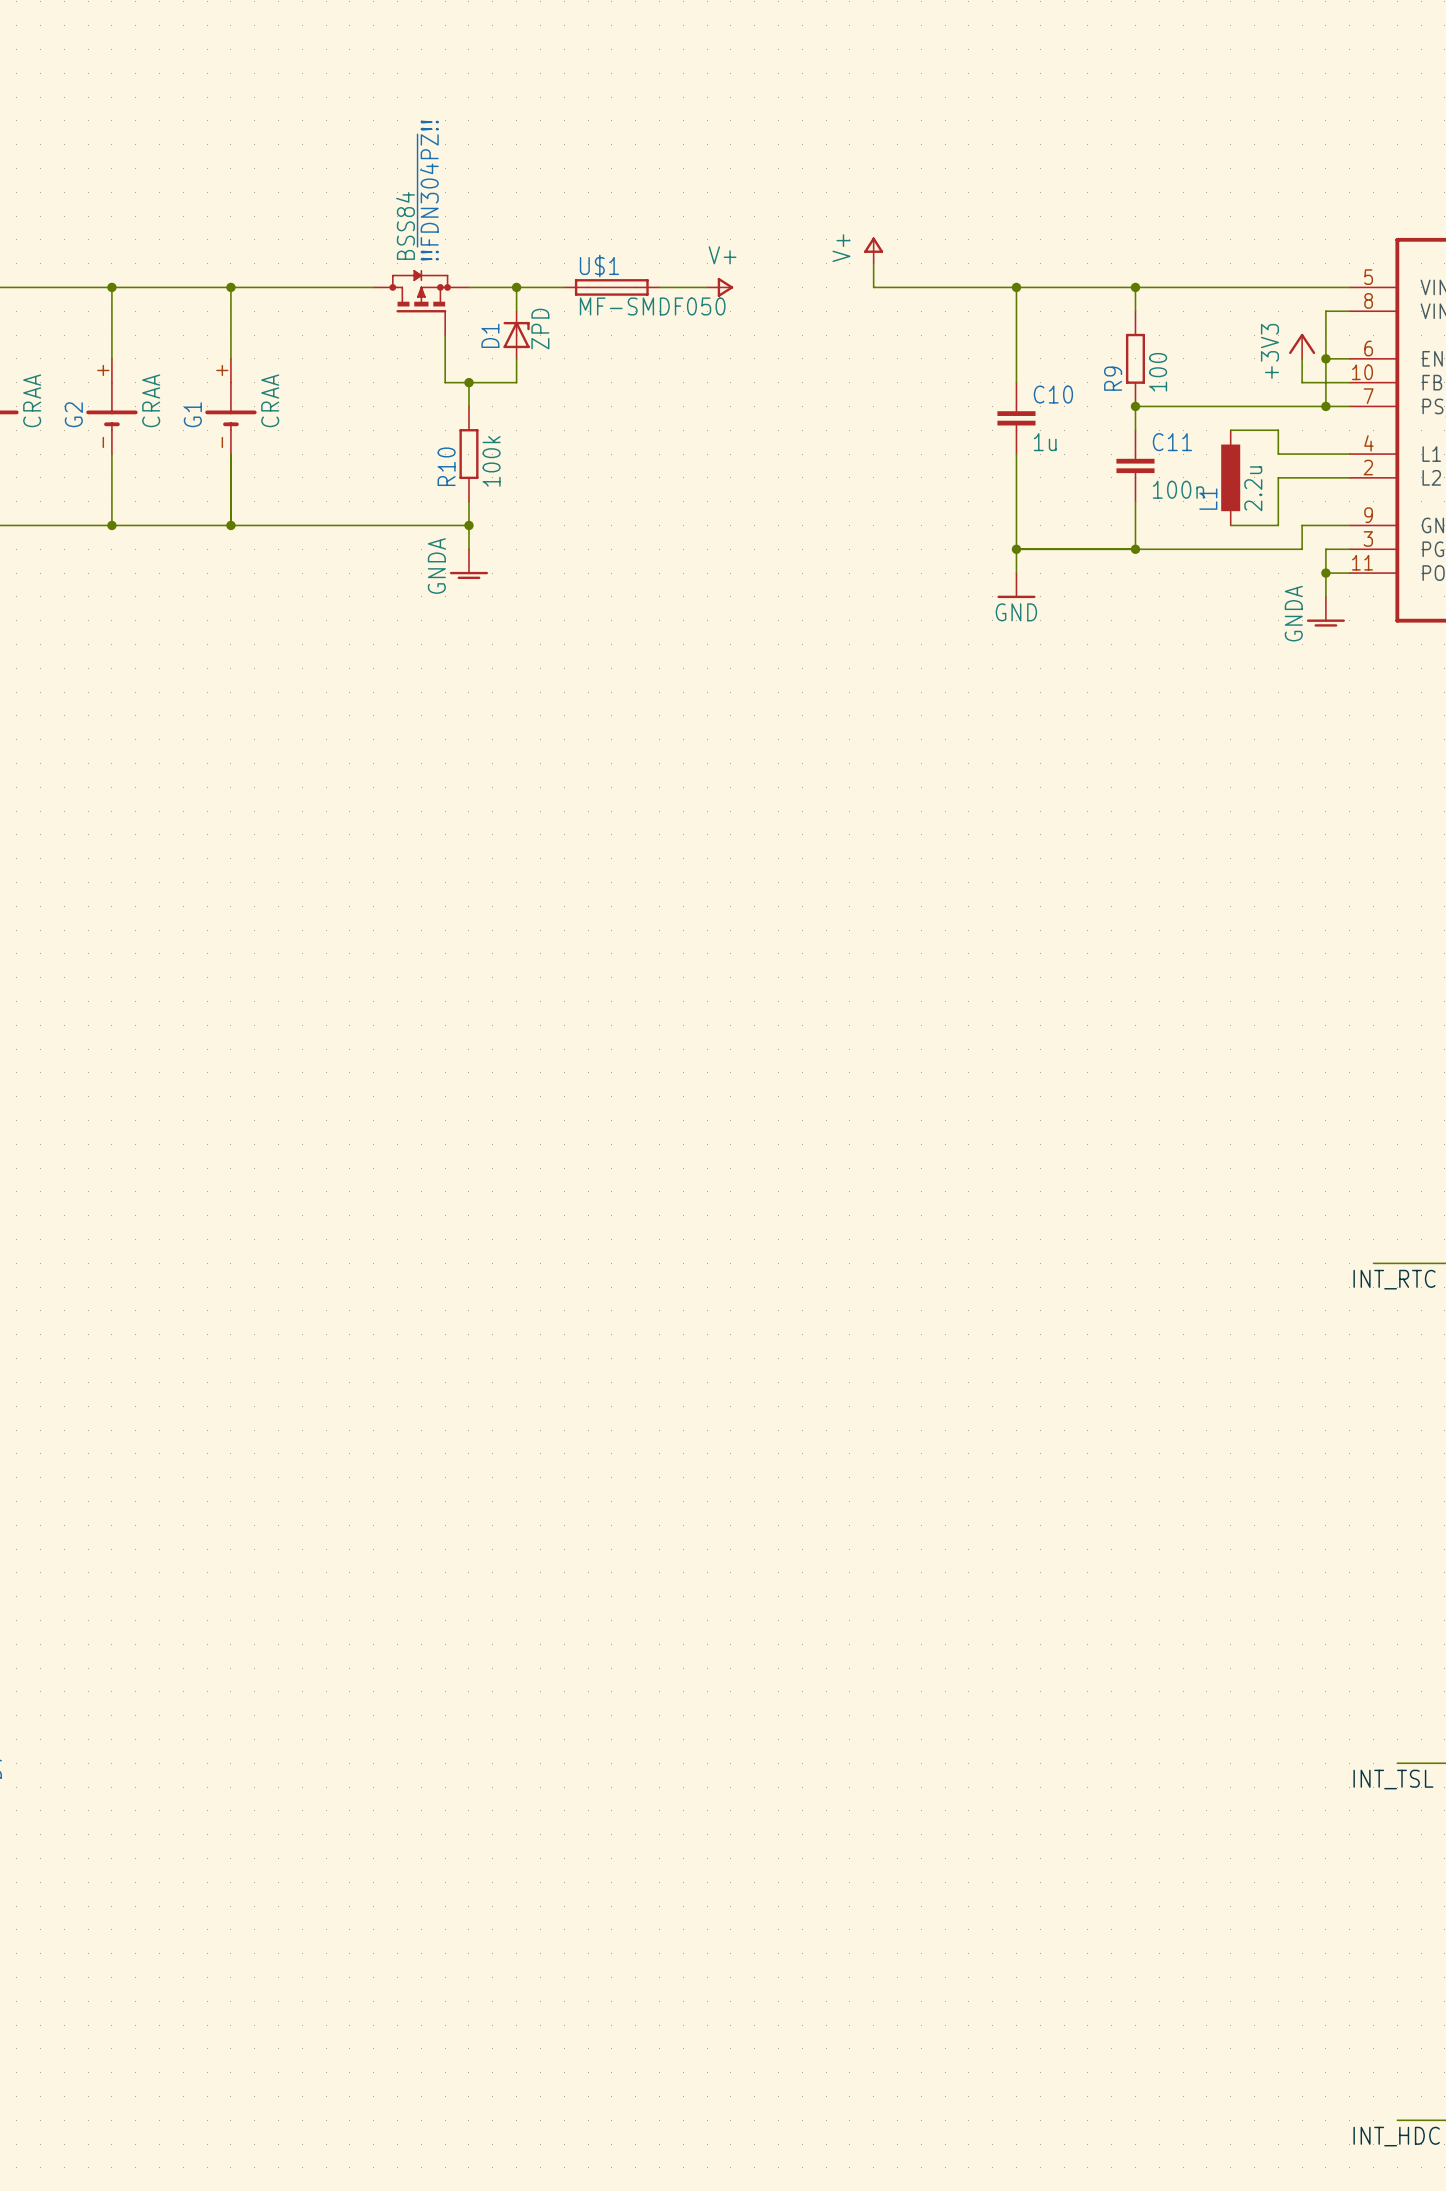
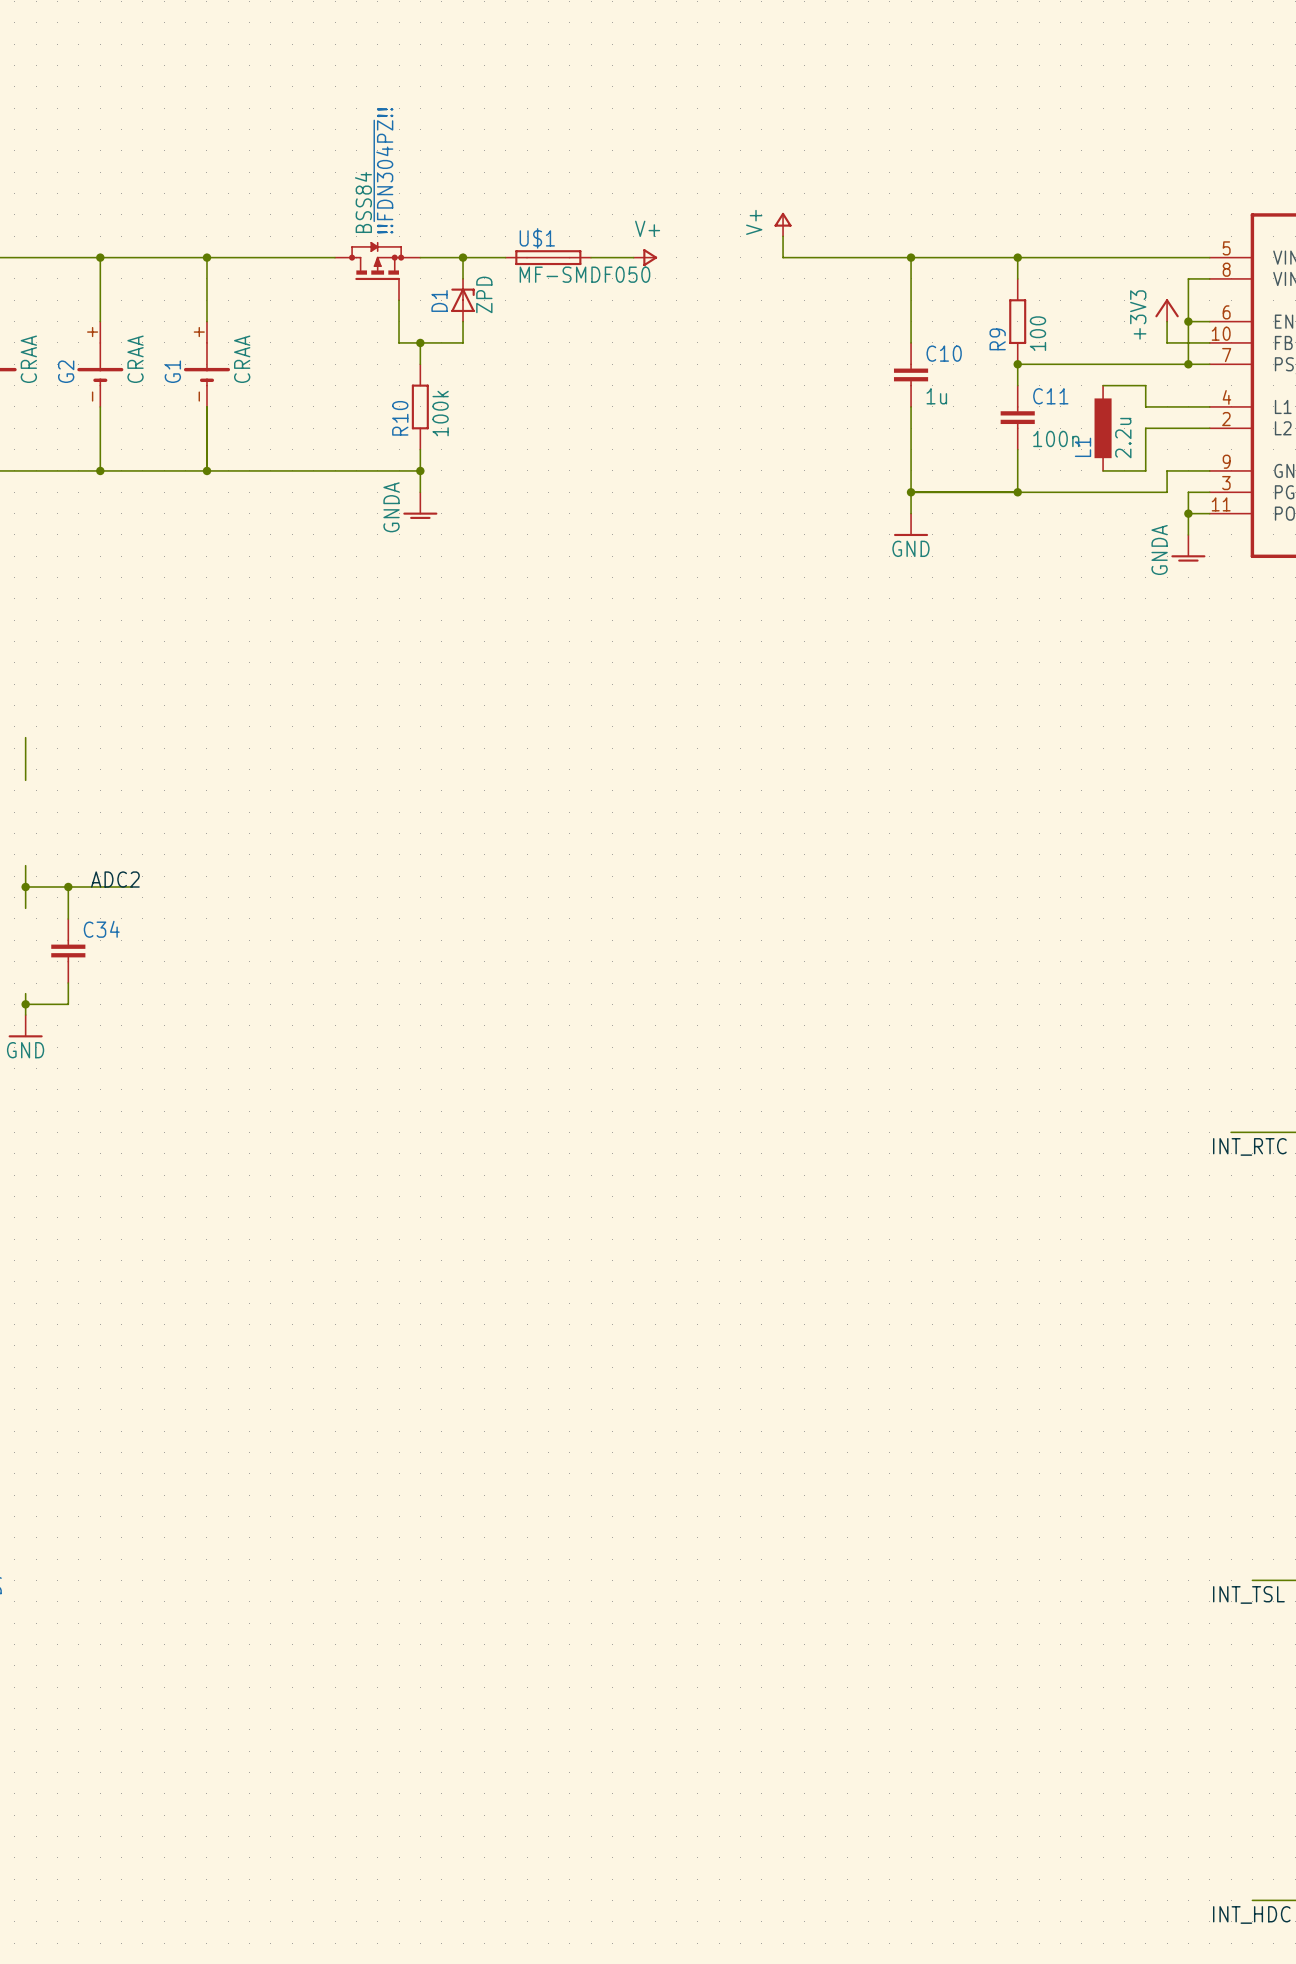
wire: none -> (25, 737) (25, 780)
wire: none -> (25, 865) (25, 908)
label: none -> ADC2 (115, 879)
wire: none -> (25, 886) (132, 886)
junction: none -> (25, 886)
wire: none -> (68, 886) (68, 918)
junction: none -> (68, 886)
C34: none -> (68, 951)
wire: none -> (68, 983) (68, 1004) (25, 1004)
wire: none -> (25, 993) (25, 1015)
junction: none -> (25, 1004)
power symbol: none -> GND (25, 1026)

